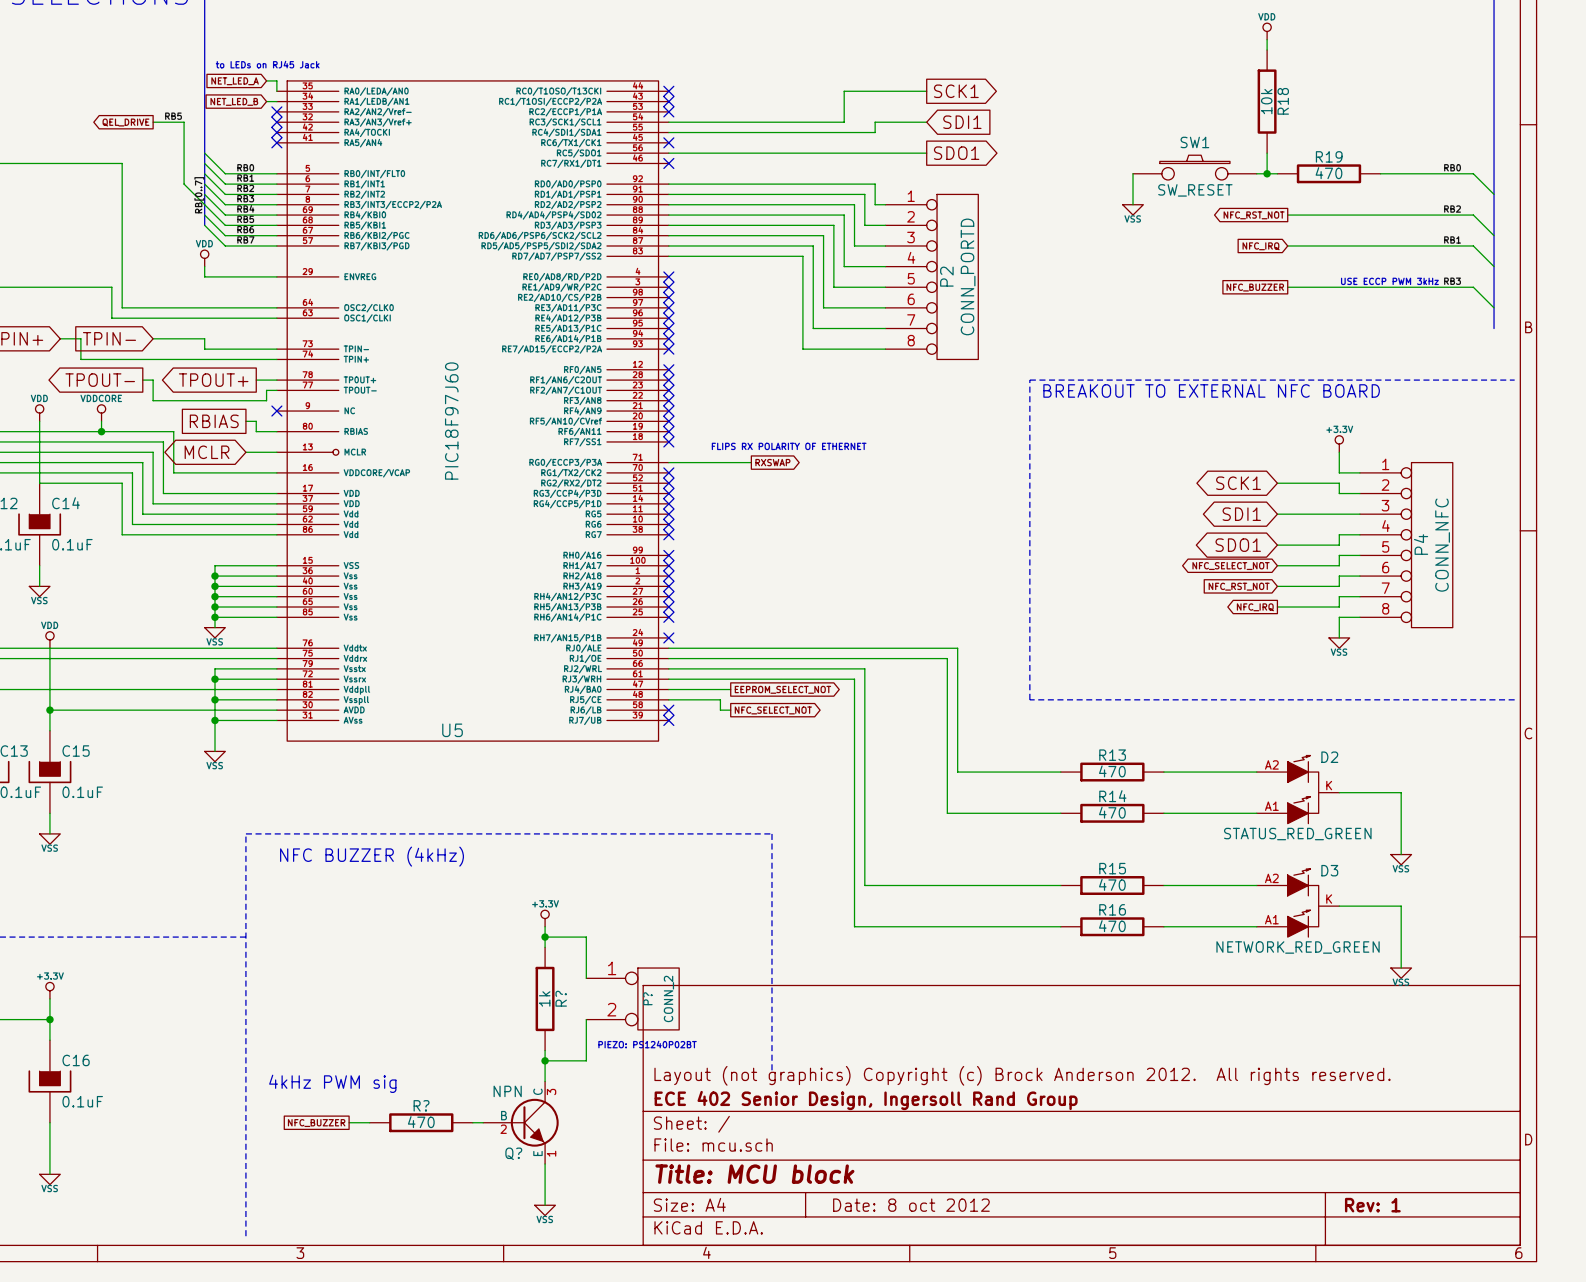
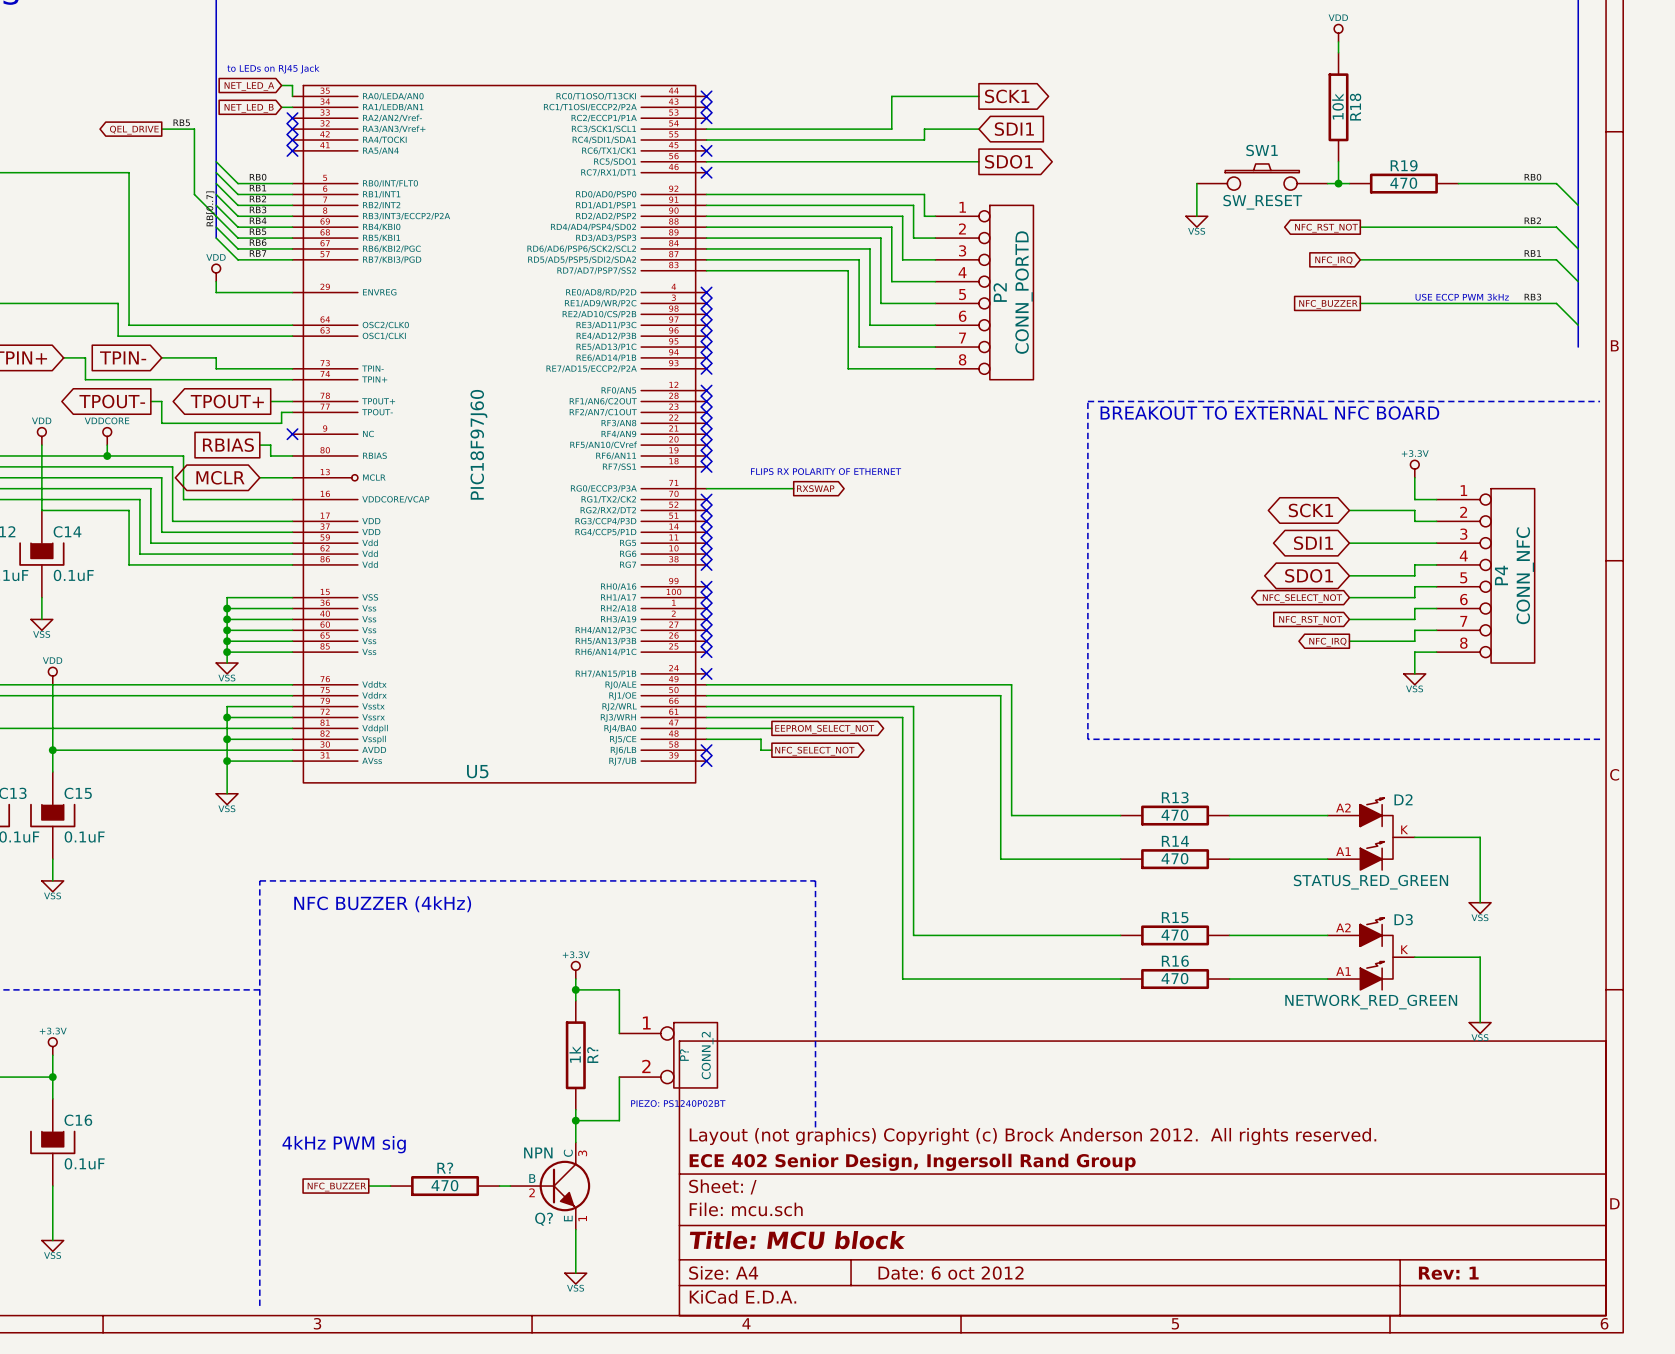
title block: Date: 8 oct 2012 (911, 1205) -> Date: 6 oct 2012 (951, 1273)

